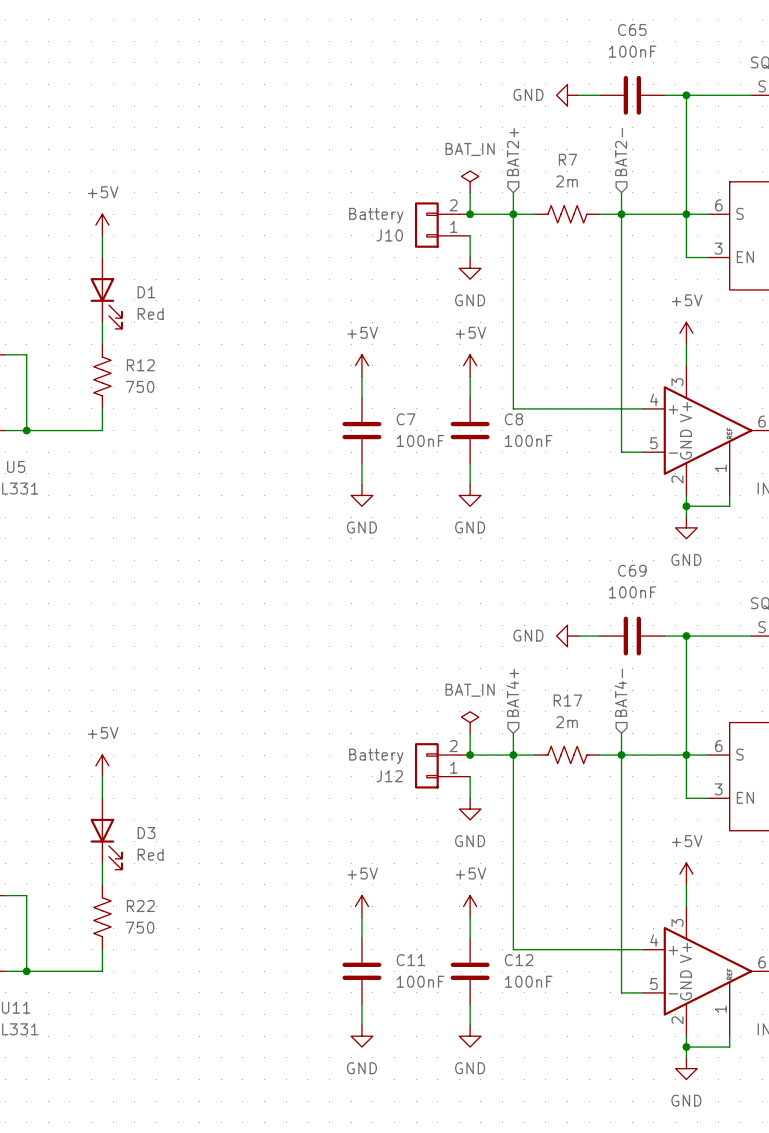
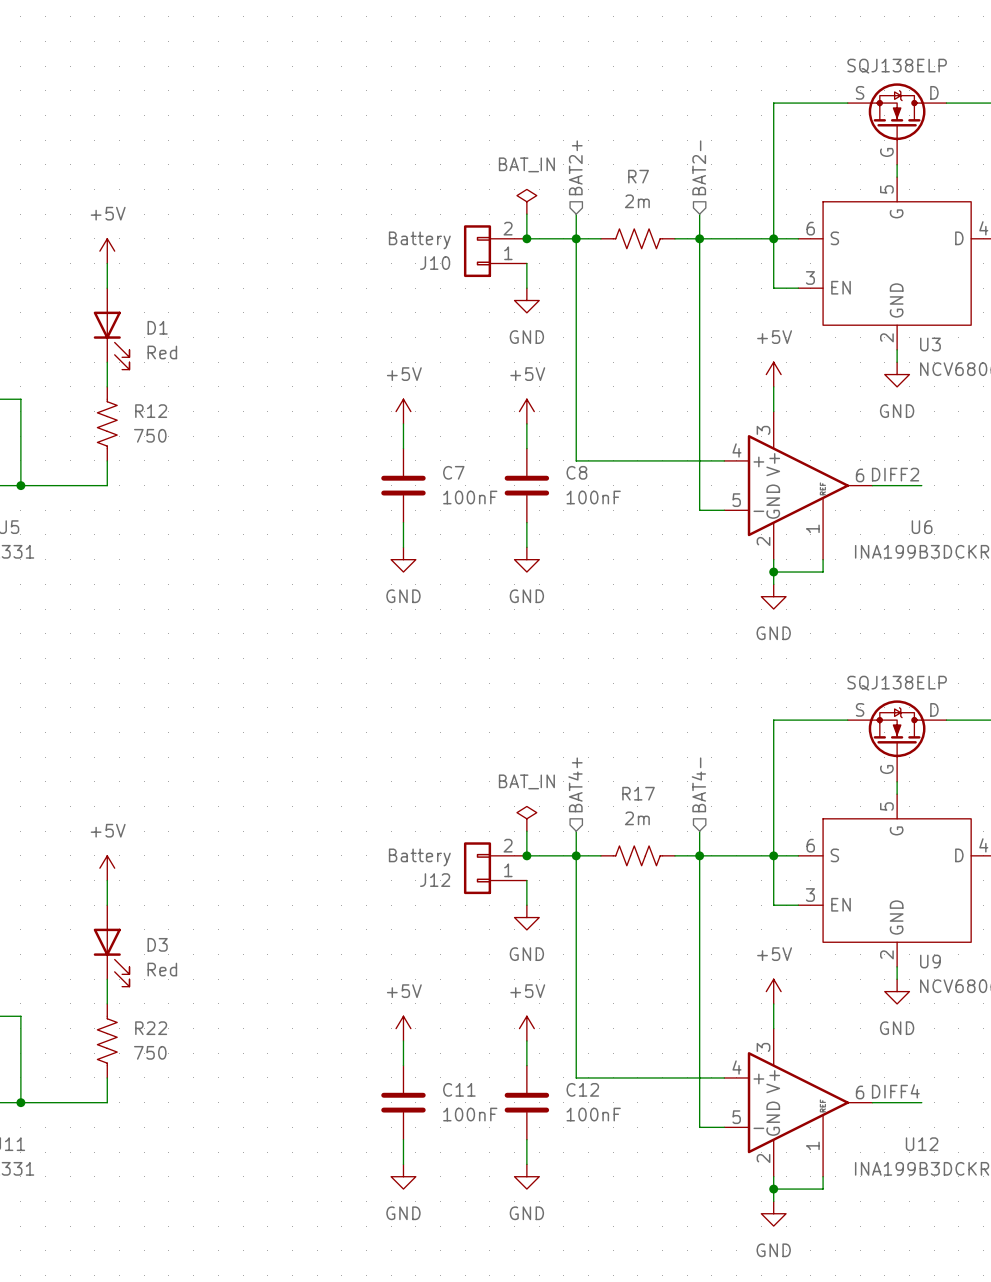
power symbol: GND (567, 95) -> none
wire: (578, 95) (599, 95) -> none
C65: 100nF (632, 95) -> none
wire: (664, 95) (686, 95) -> none
junction: (686, 95) -> none
power symbol: GND (567, 636) -> none
wire: (578, 636) (599, 636) -> none
C69: 100nF (632, 636) -> none
wire: (664, 636) (686, 636) -> none
junction: (686, 636) -> none

